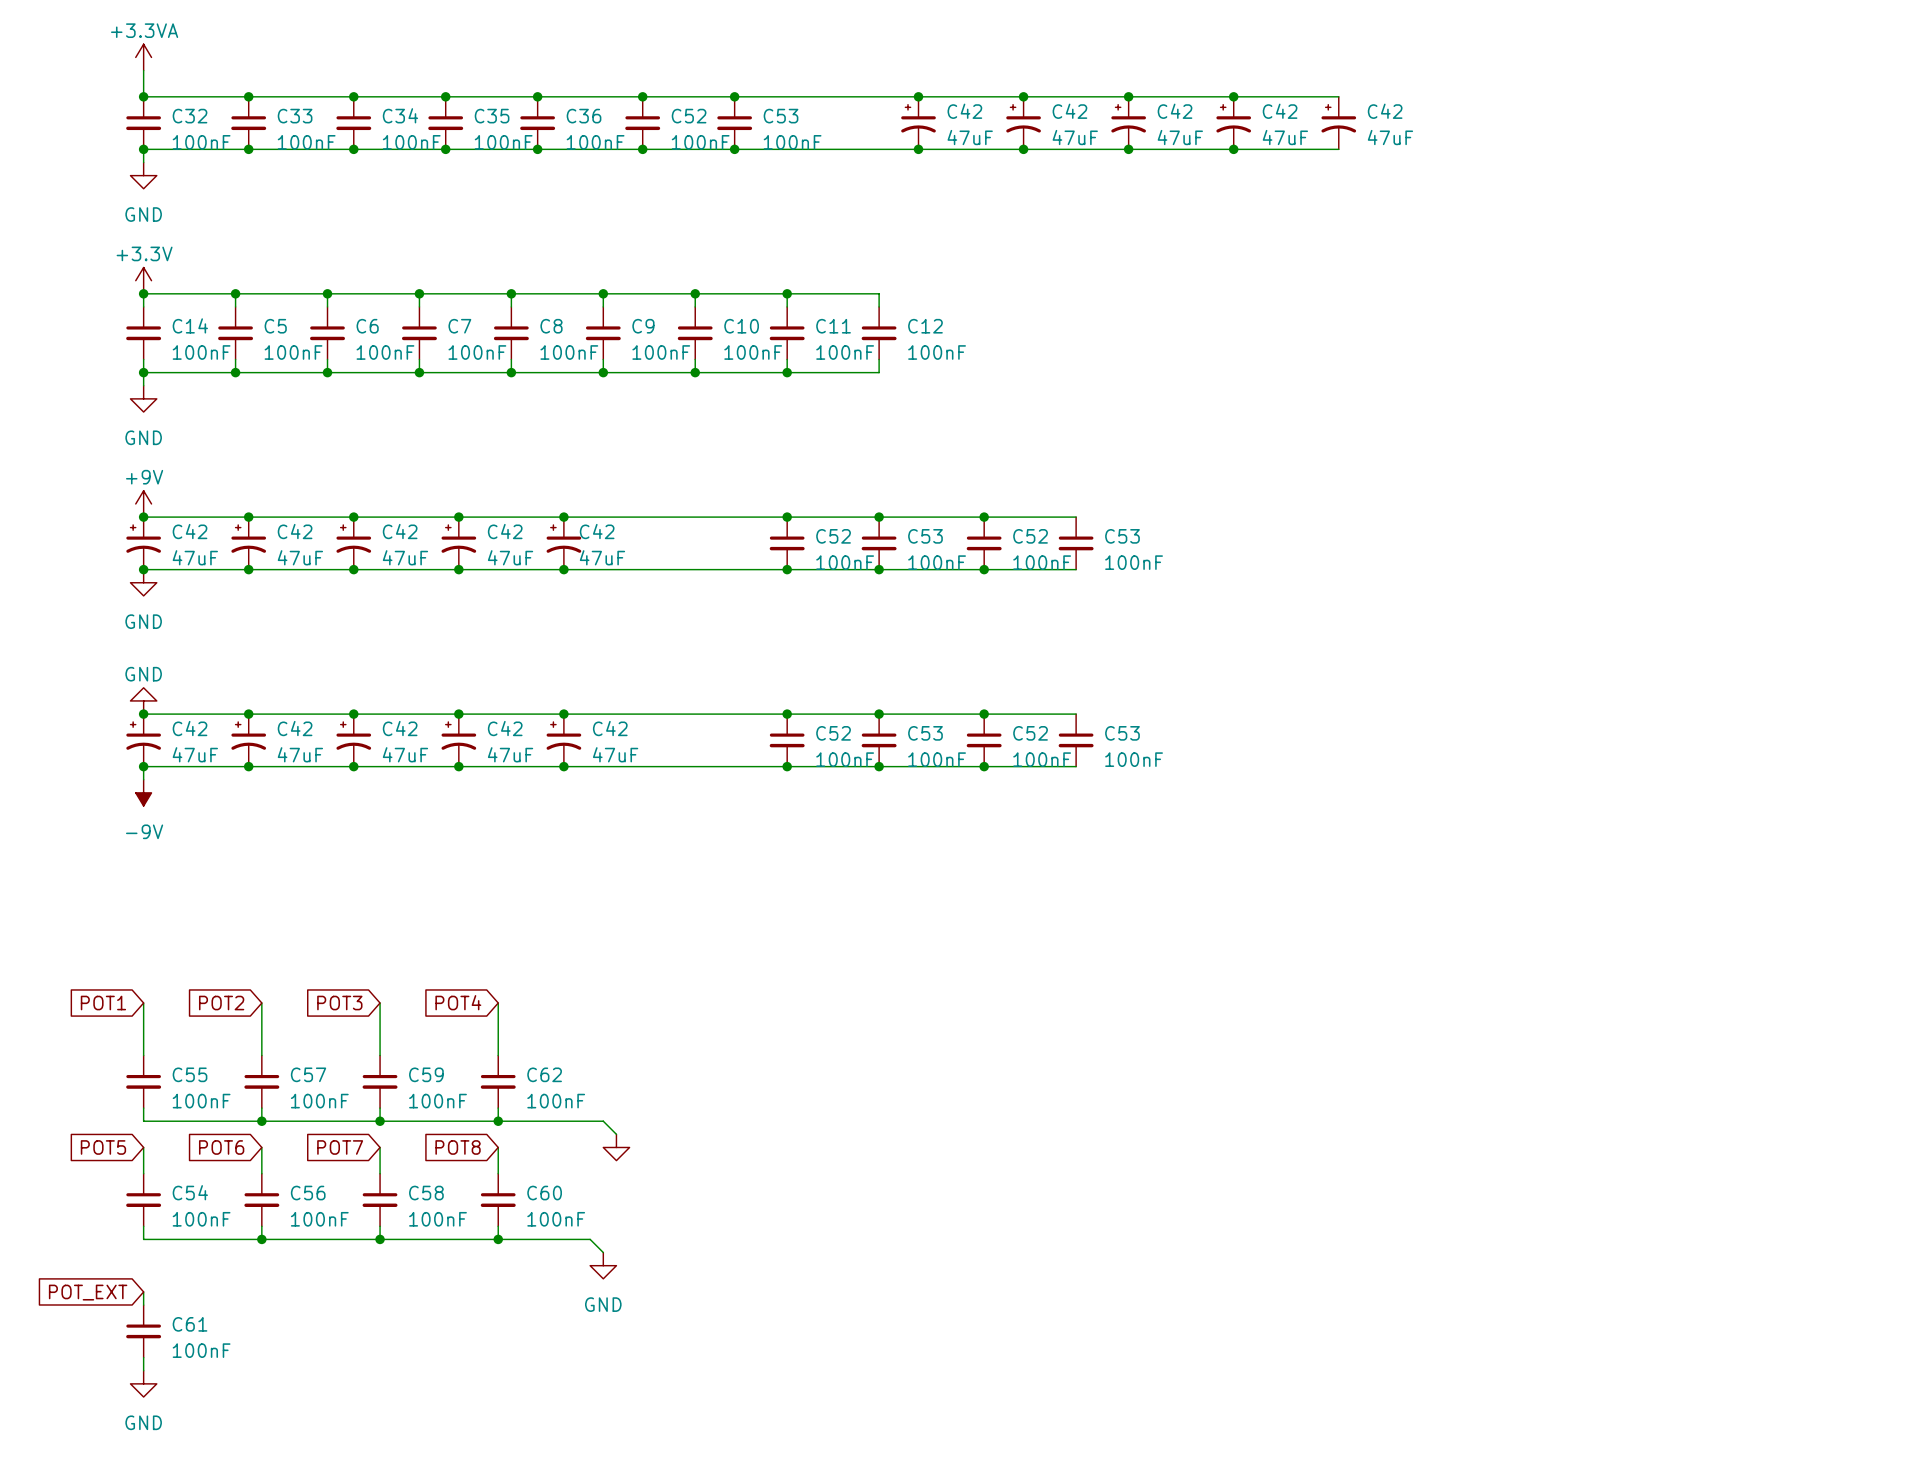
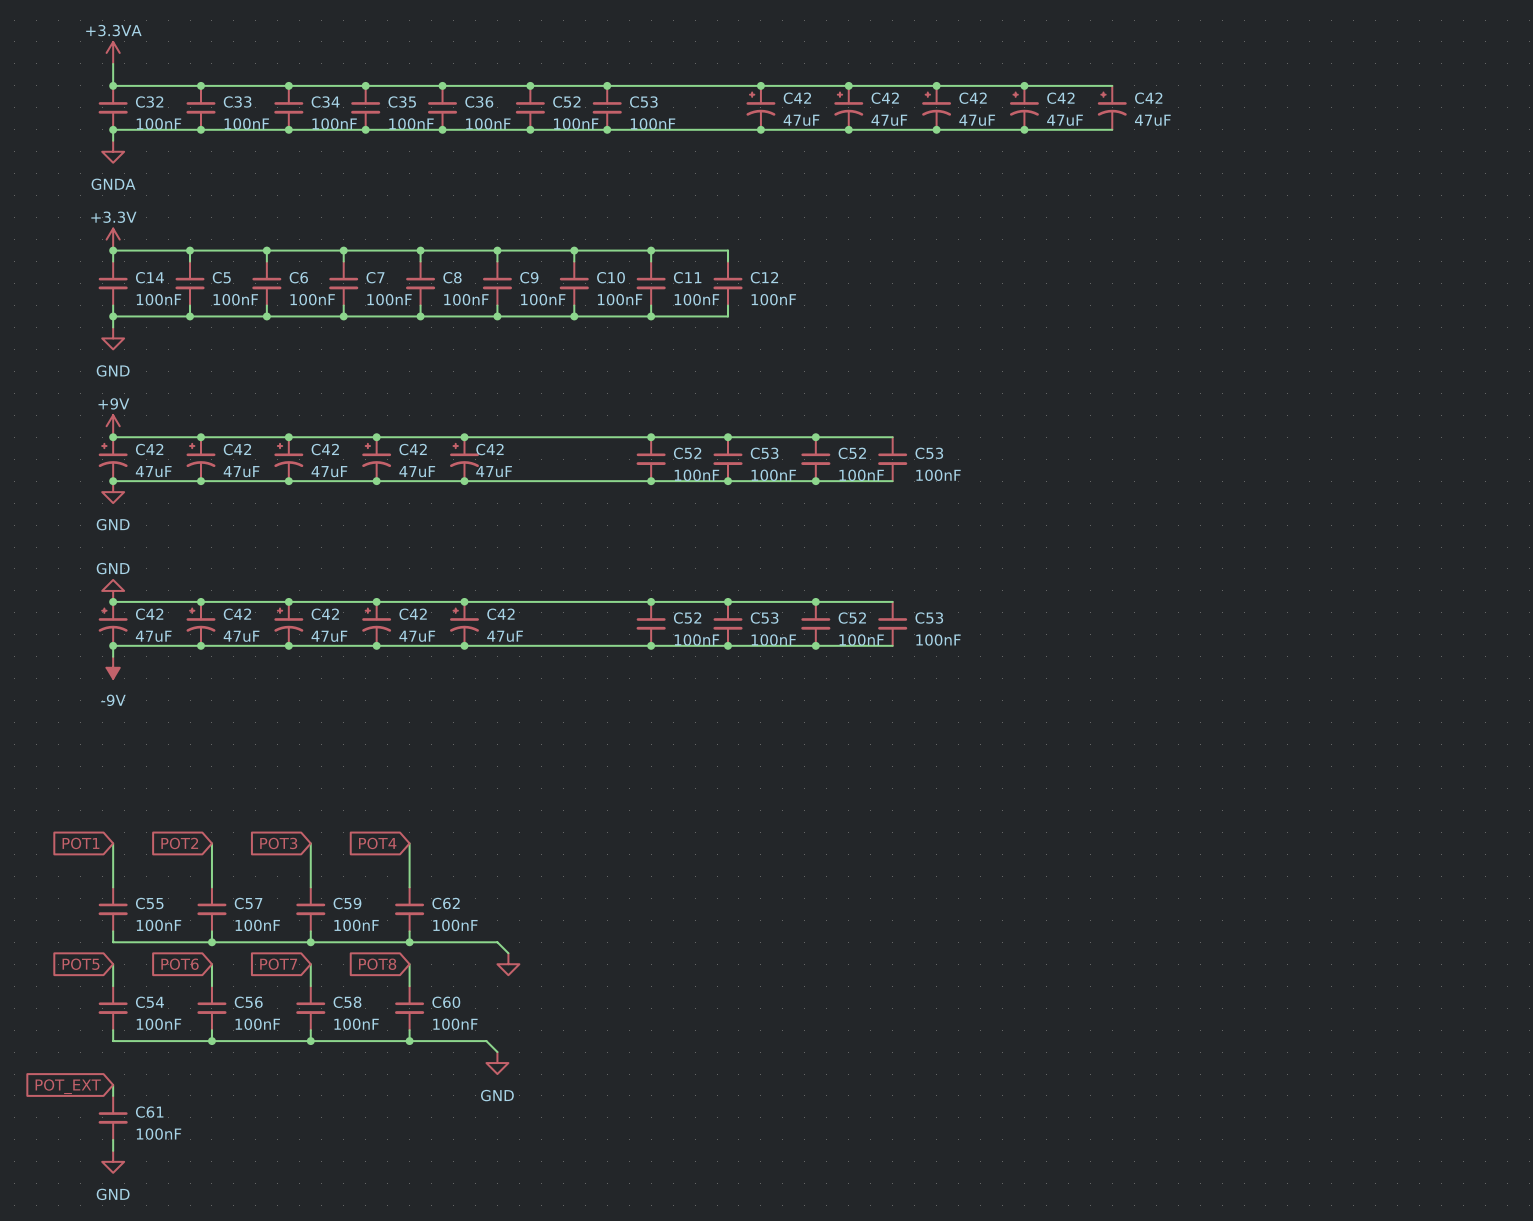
power symbol: GND (143, 175) -> GNDA (113, 151)

